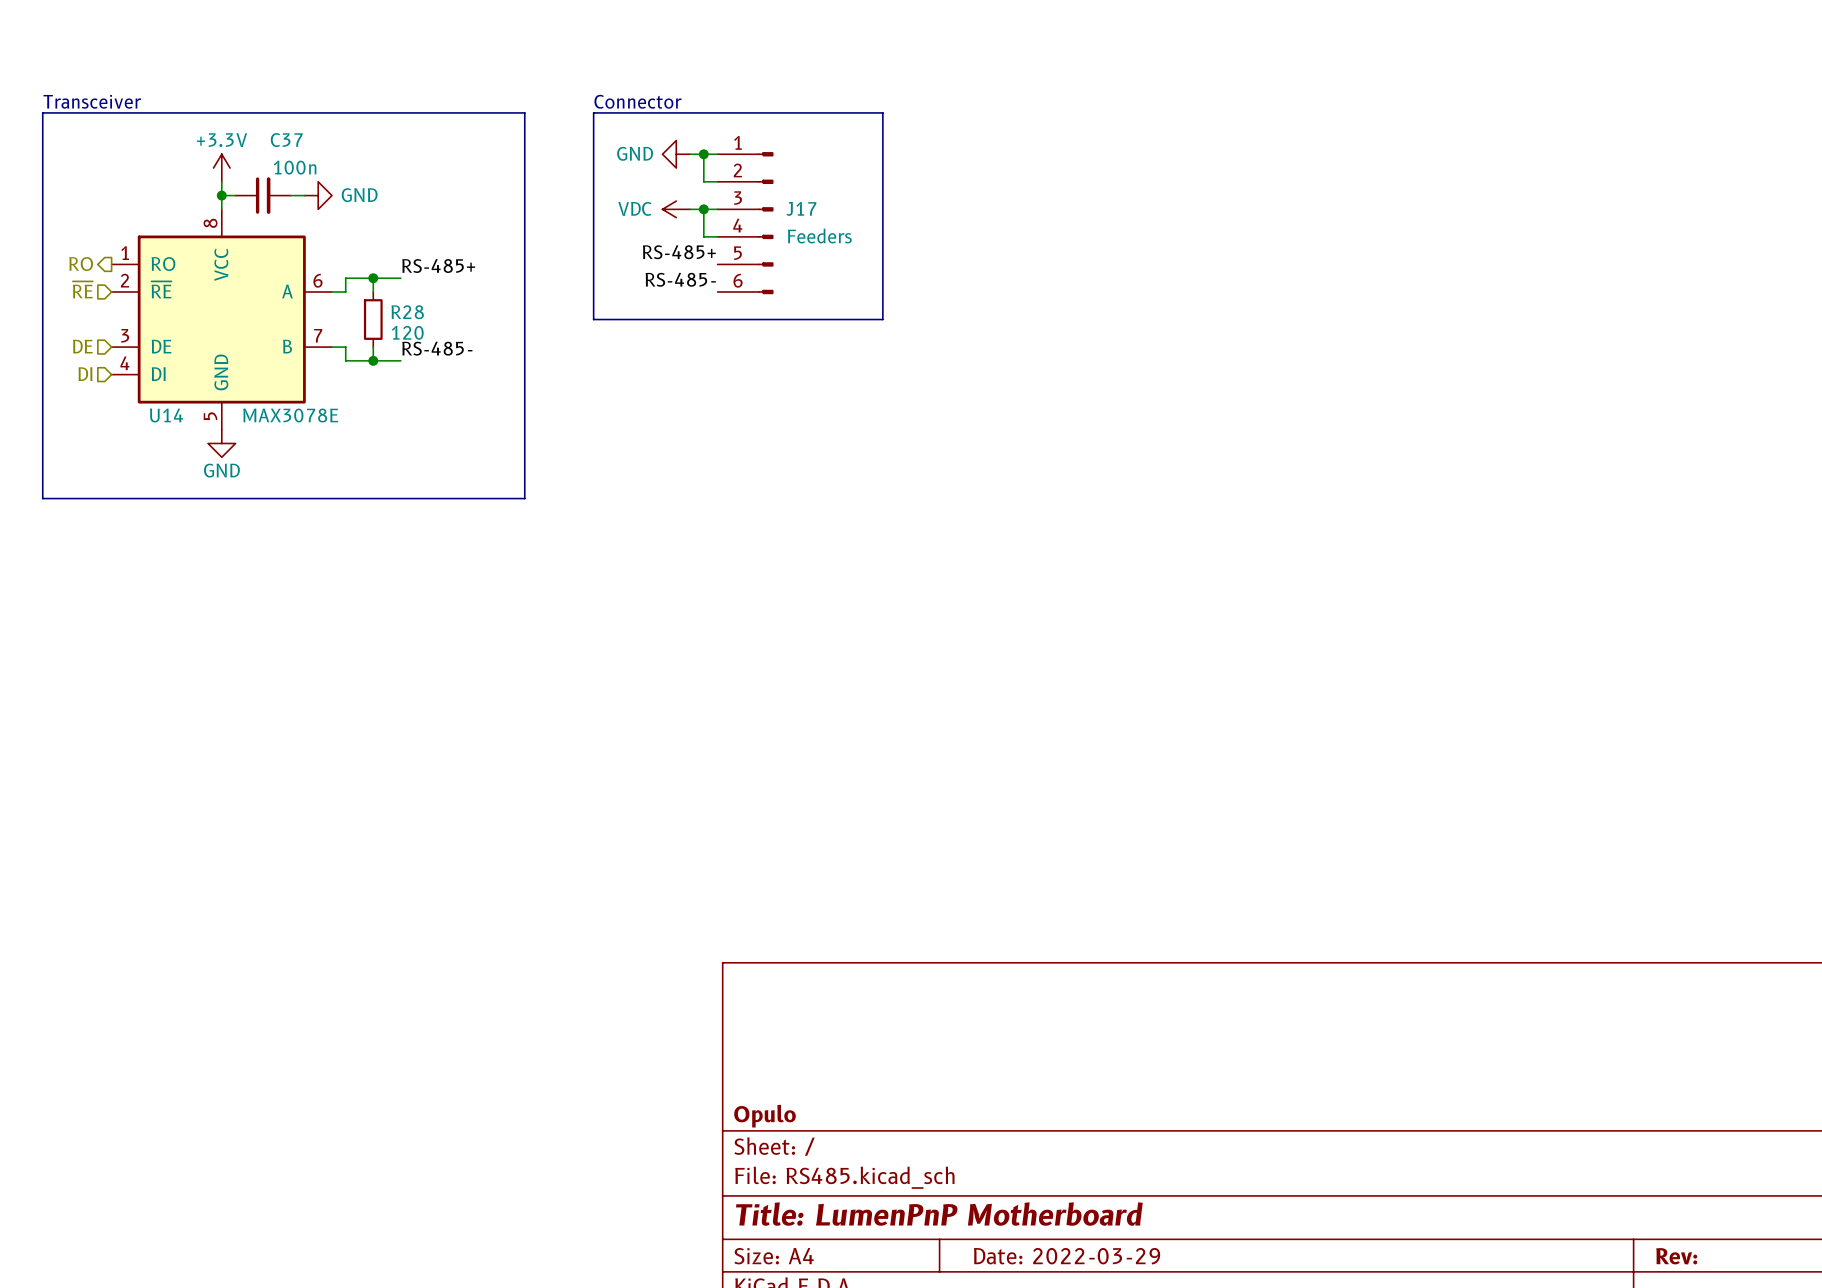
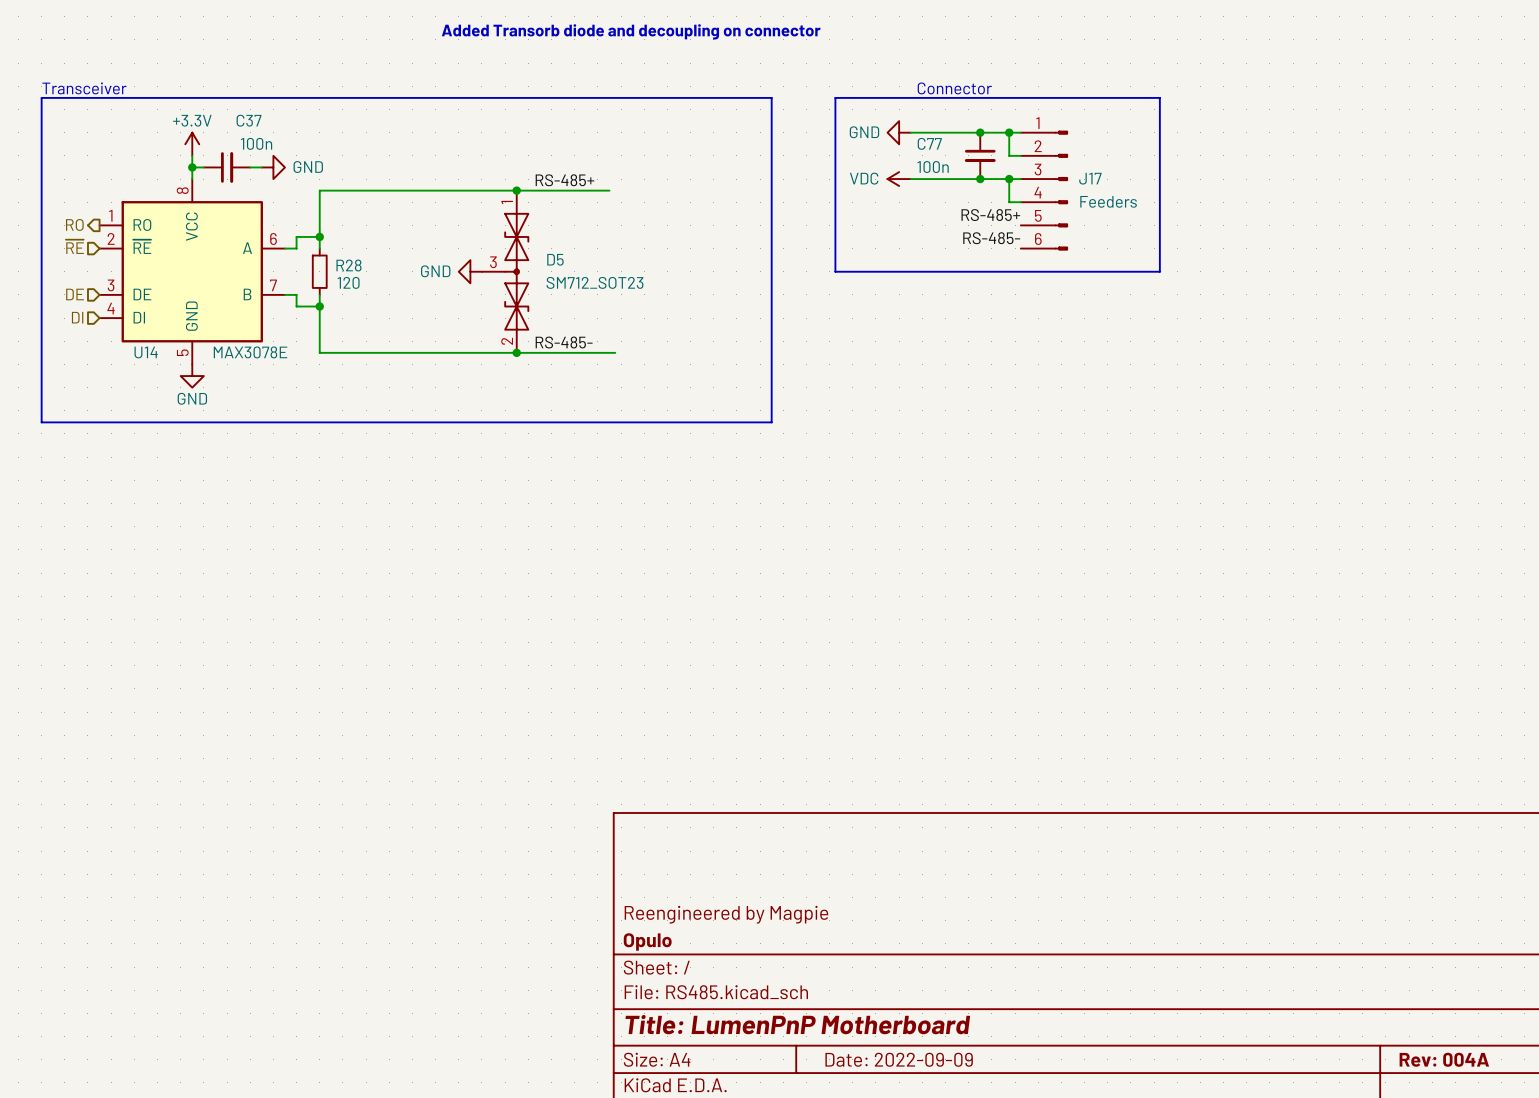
text: none -> Added Transorb diode and decoupling on connector (631, 31)
text: Connector (637, 101) -> none
text: none -> Connector (954, 88)
line: (524, 112) (524, 498) -> (748, 97) (771, 97) (771, 422) (447, 422)
line: (593, 112) (593, 319) (882, 319) (882, 112) -> (505, 97) (447, 97)
line: none -> (835, 97) (835, 271) (1159, 271) (1159, 97) (835, 97)
power symbol: GND (676, 154) -> none
wire: (690, 154) (717, 154) -> none
wire: (703, 154) (703, 181) (717, 181) -> none
junction: (703, 154) -> none
power symbol: none -> GND (899, 132)
wire: none -> (910, 132) (1020, 132)
junction: none -> (980, 132)
wire: none -> (1009, 132) (1009, 155) (1020, 155)
junction: none -> (1009, 132)
C77: none -> 100n (980, 155)
power symbol: VDC (676, 209) -> none
wire: (690, 209) (717, 209) -> none
wire: (703, 209) (703, 236) (717, 236) -> none
junction: (703, 209) -> none
power symbol: none -> VDC (899, 179)
wire: none -> (910, 179) (1020, 179)
junction: none -> (980, 179)
wire: none -> (1009, 179) (1009, 202) (1020, 202)
junction: none -> (1009, 179)
junction: none -> (516, 190)
J17 position: (745, 223) -> (1044, 190)
label position: RS-485+ (679, 252) -> RS-485+ (565, 180)
label: none -> RS-485+ (990, 215)
label: RS-485+ (438, 266) -> none
wire: (373, 278) (400, 278) -> (319, 236) (319, 190) (609, 190)
label: RS-485- (680, 279) -> none
label: none -> RS-485- (991, 238)
power symbol: none -> GND (470, 271)
D5: none -> SM712_SOT23 (505, 271)
label: RS-485- (437, 348) -> none
wire: (373, 360) (400, 360) -> (319, 306) (319, 352) (615, 352)
label: none -> RS-485- (564, 342)
junction: none -> (516, 352)
title block: none -> Reengineered by Magpie (726, 914)
title block: Date: 2022-03-29 (1067, 1256) -> Date: 2022-09-09 (899, 1059)
title block: Rev: (1676, 1256) -> Rev: 004A (1444, 1059)

